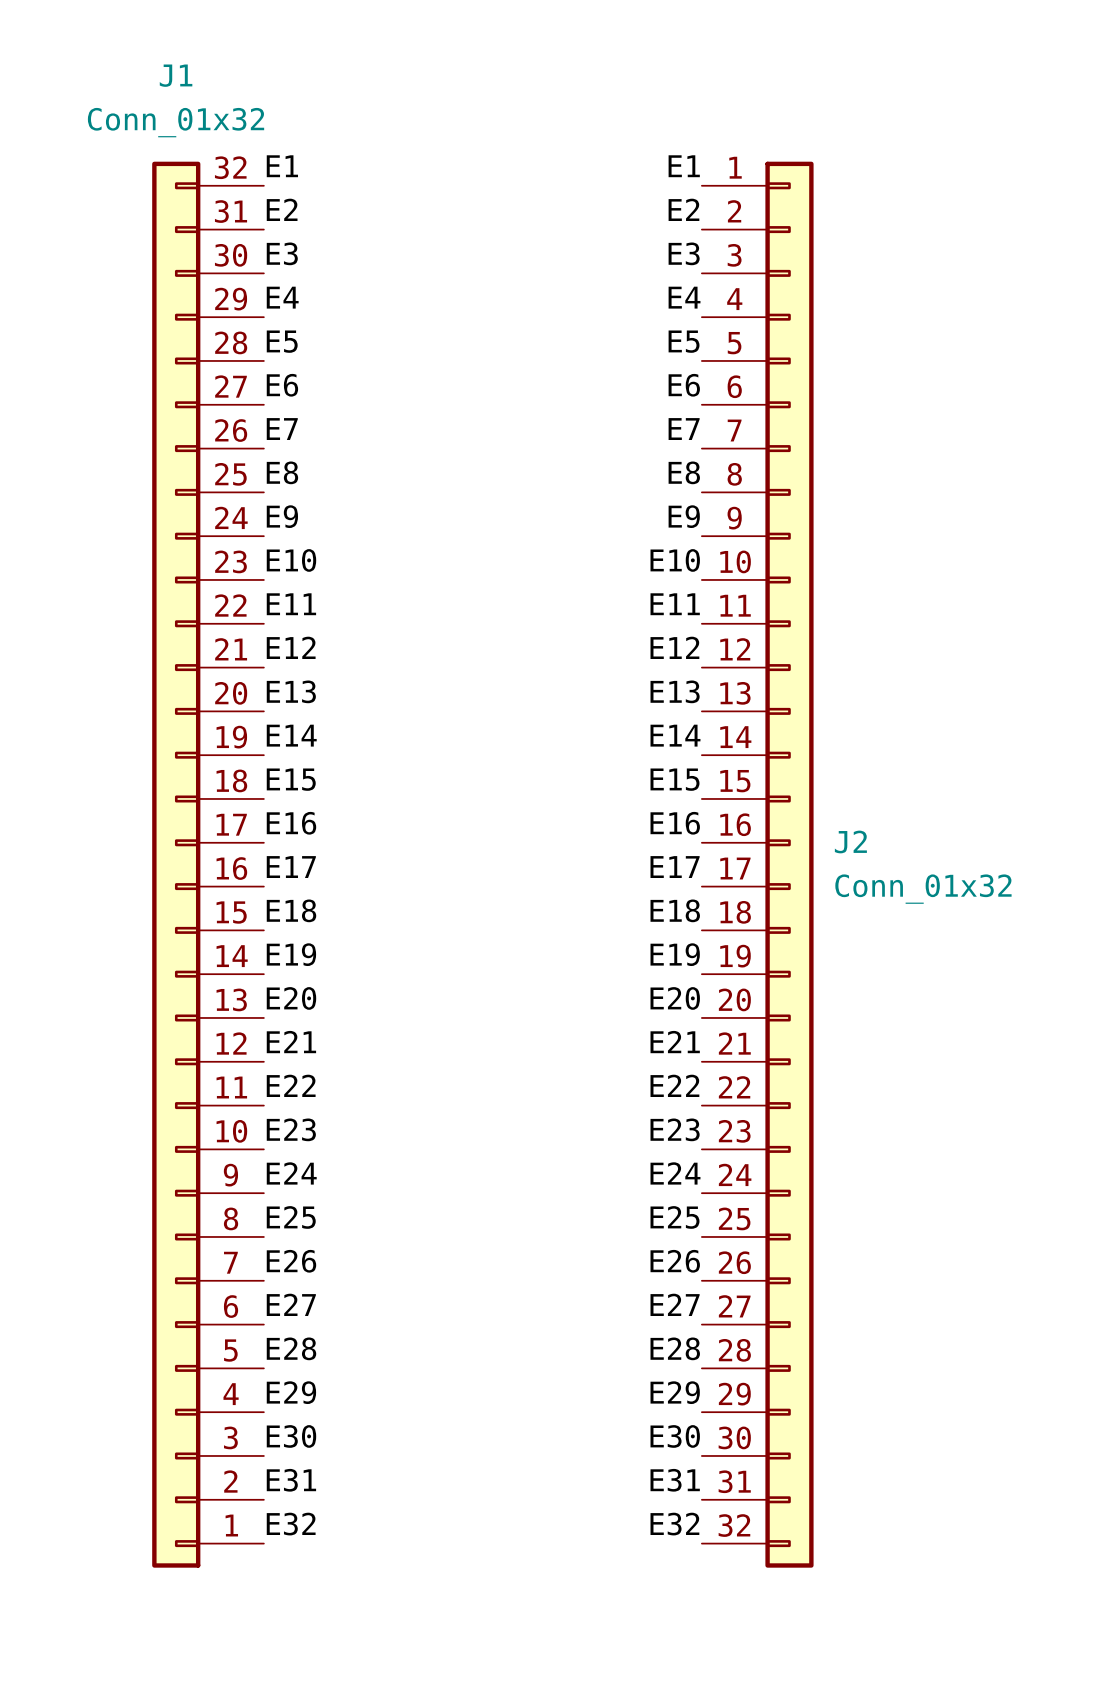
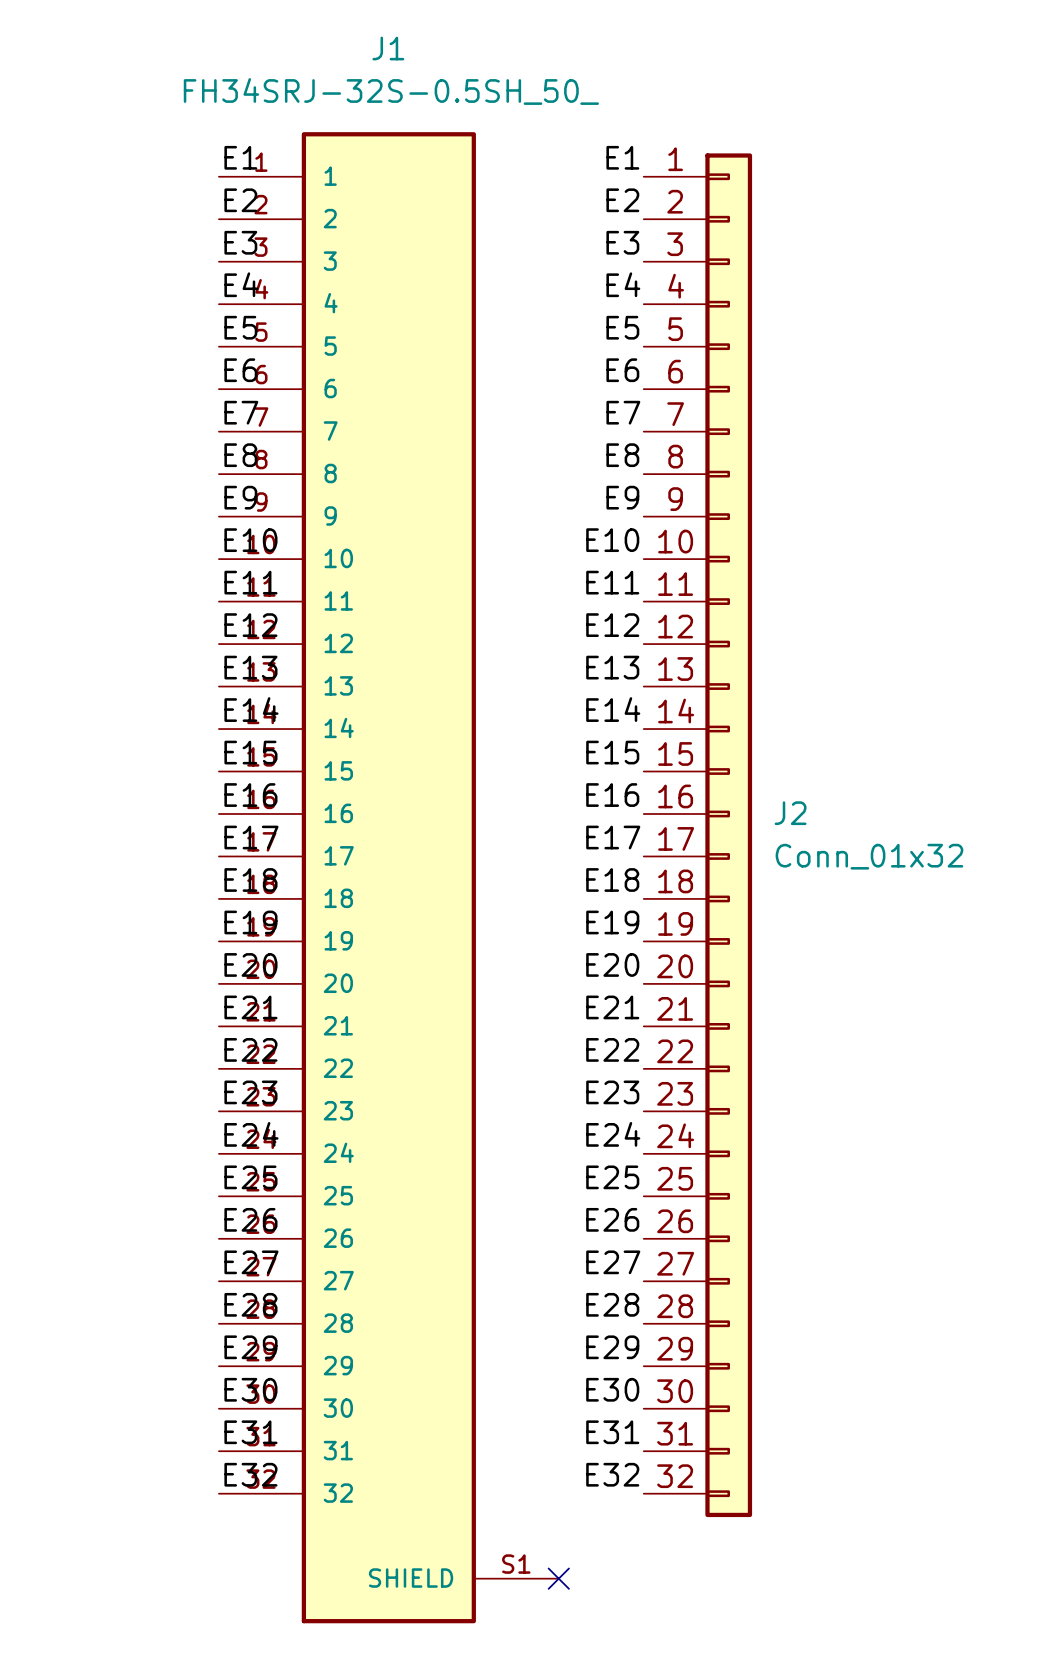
J1 name position: J1 (176, 75) -> J1 (388, 48)
J1 value: Conn_01x32 (176, 122) -> FH34SRJ-32S-0.5SH_50_ (391, 91)
J1 symbol: [152, 161, 264, 1568] -> [218, 132, 559, 1624]
no-connect mark: none -> (558, 1578)

